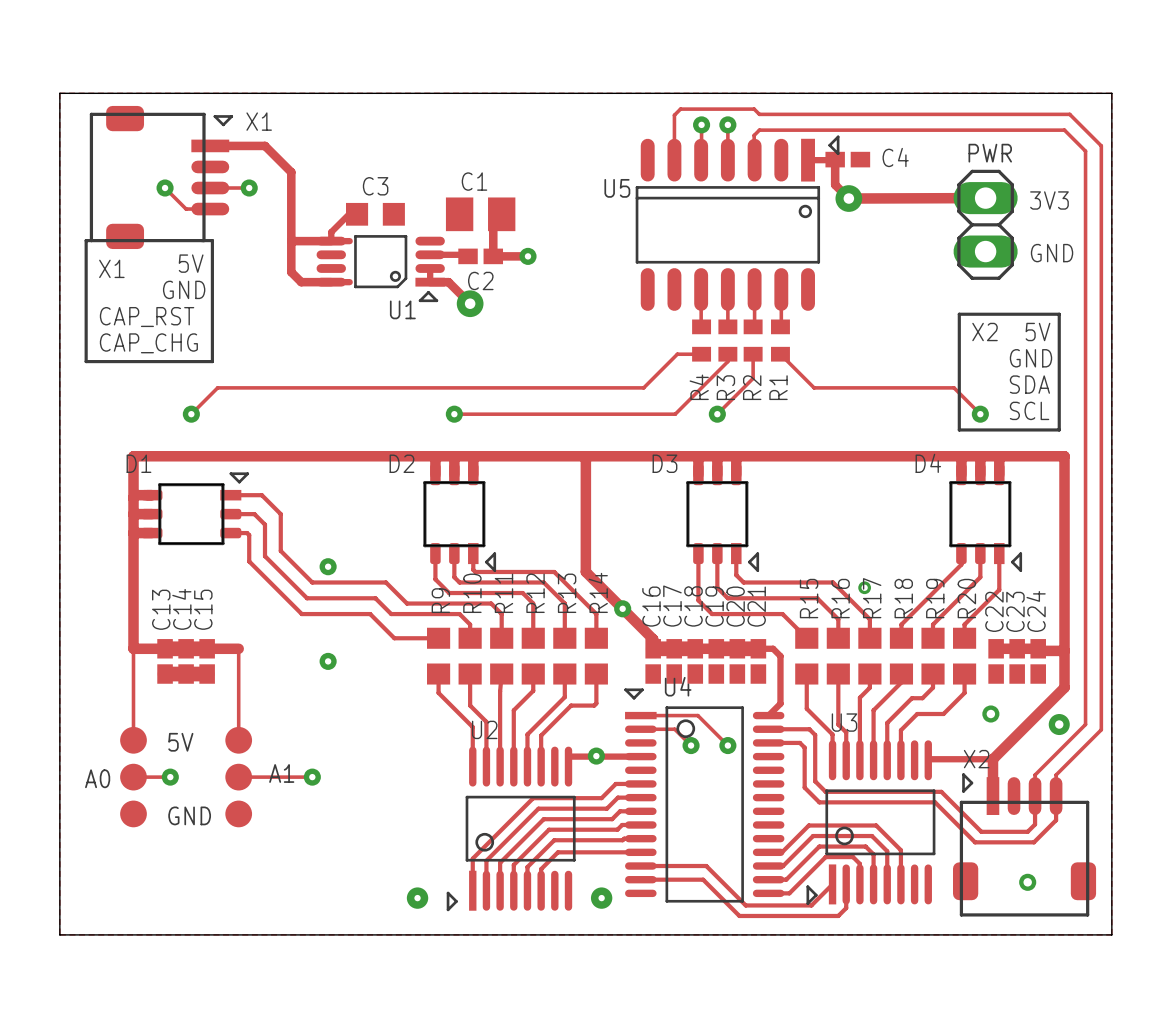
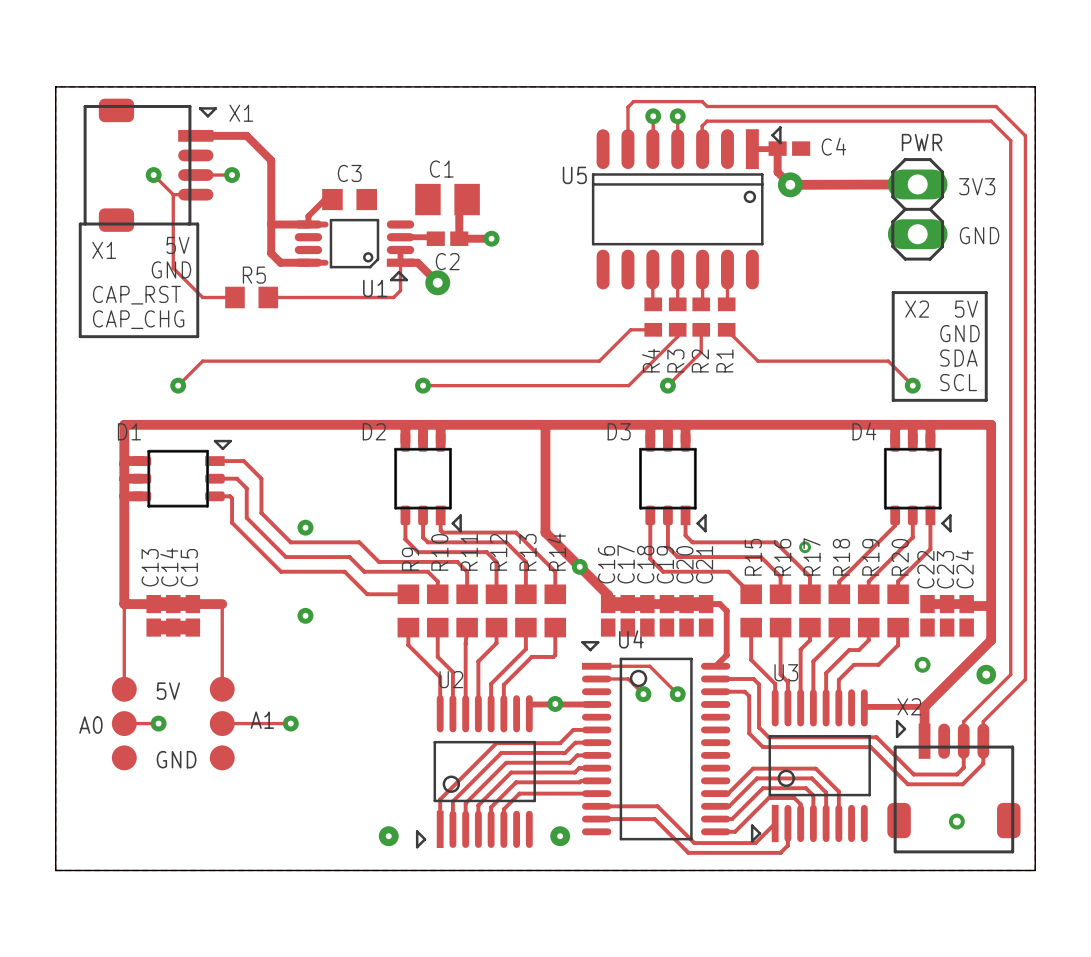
track: none -> (173, 194) (173, 268) (202, 297) (234, 297)
track: none -> (400, 262) (400, 290) (393, 297) (268, 297)
R5: none -> (251, 297)

